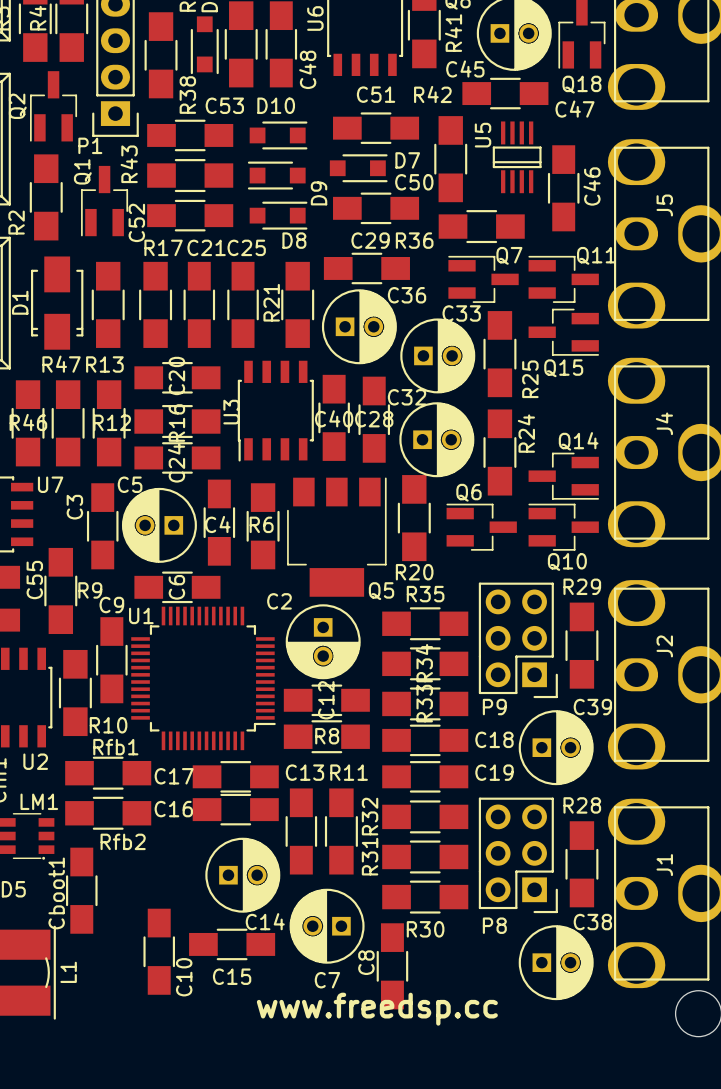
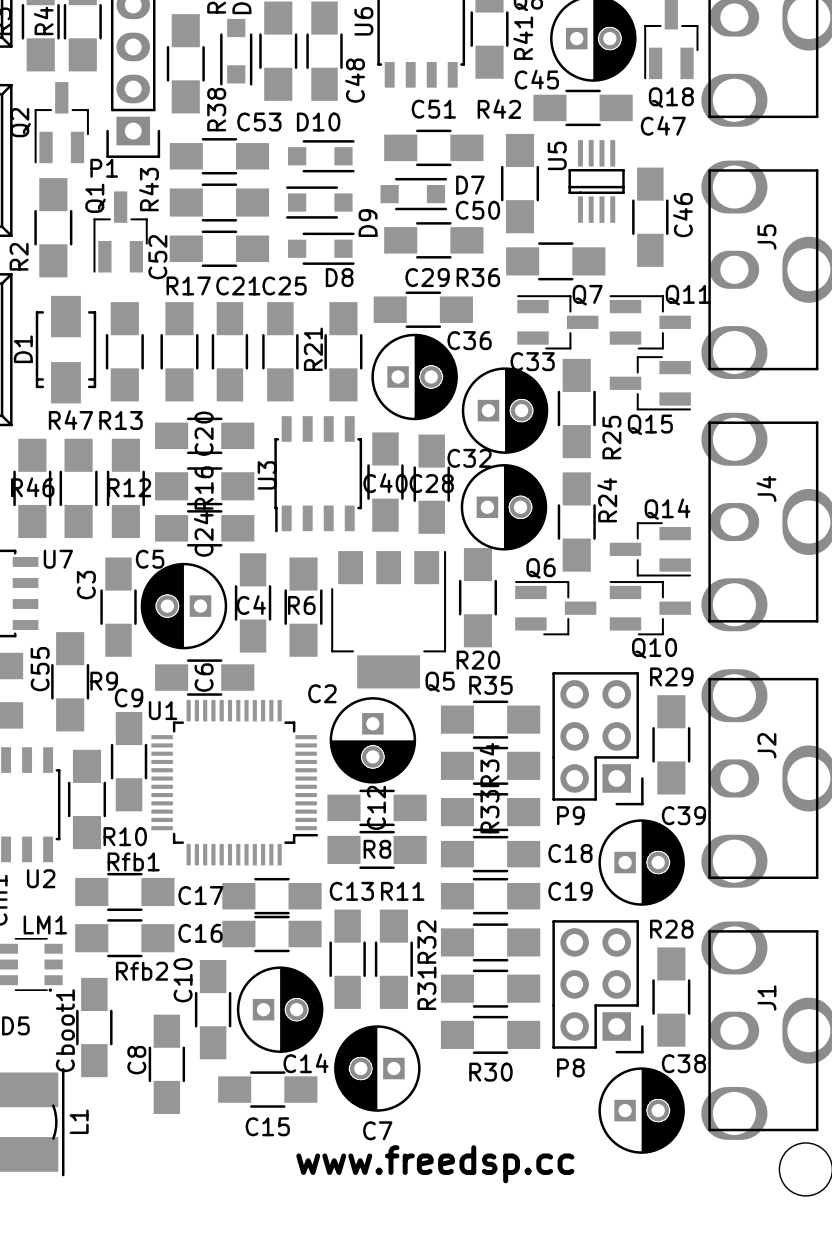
C10 position: (159, 951) -> (213, 1009)
C8 position: (392, 966) -> (166, 1064)
C10 name position: C10 (184, 977) -> C10 (183, 980)

